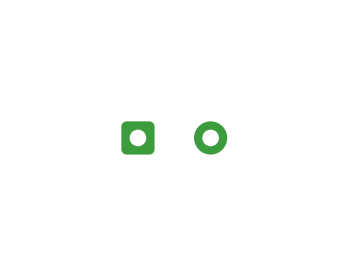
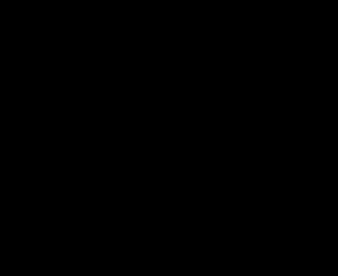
part: (174, 137) -> none

